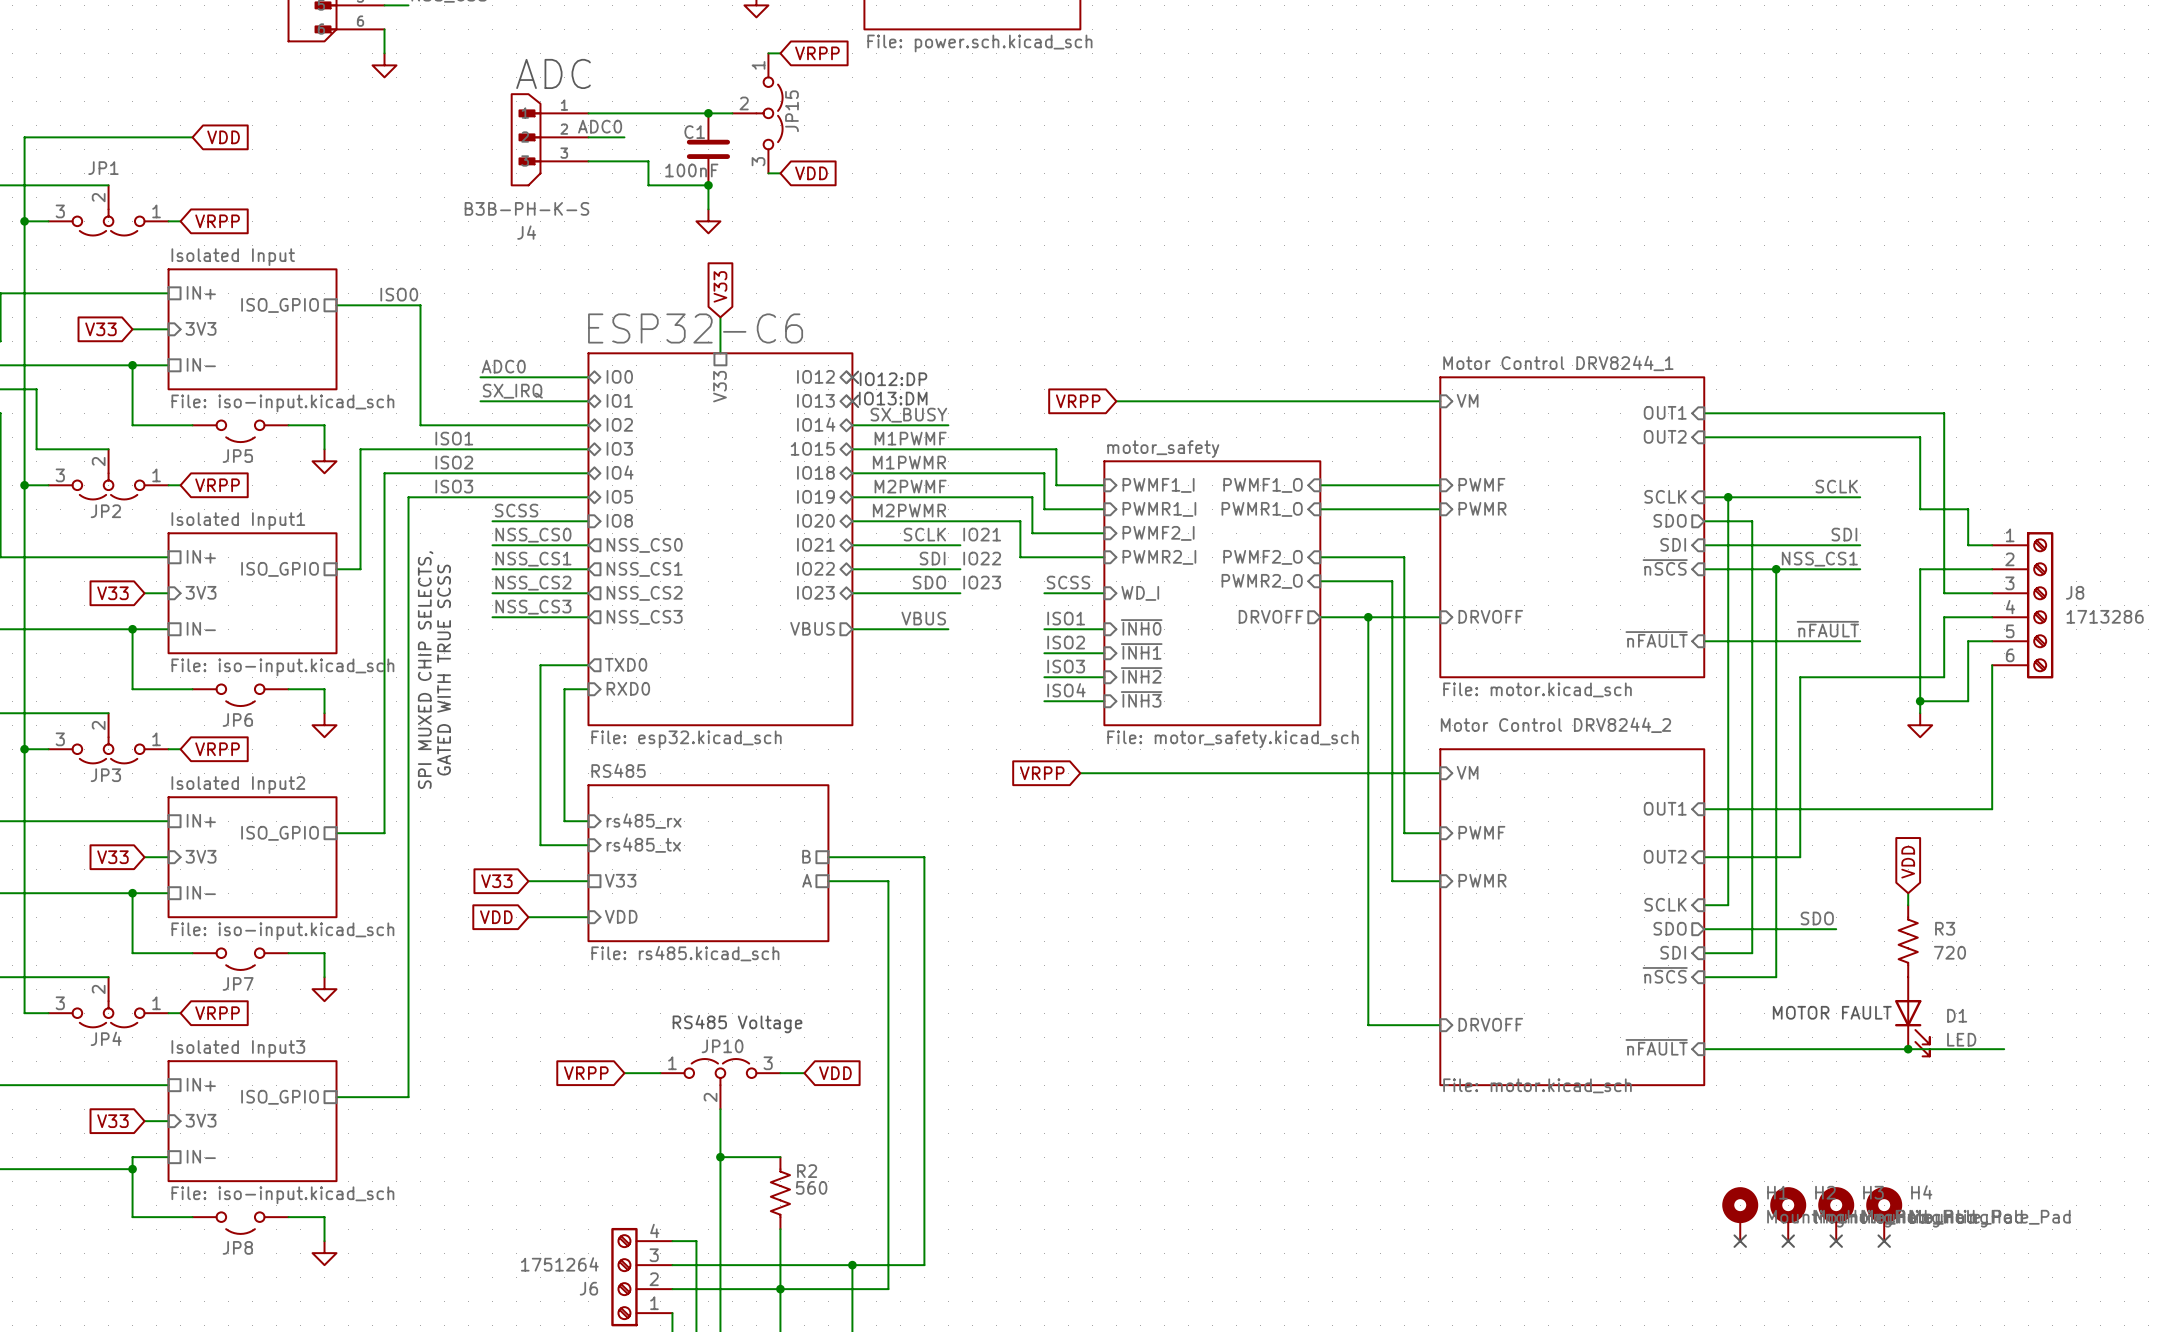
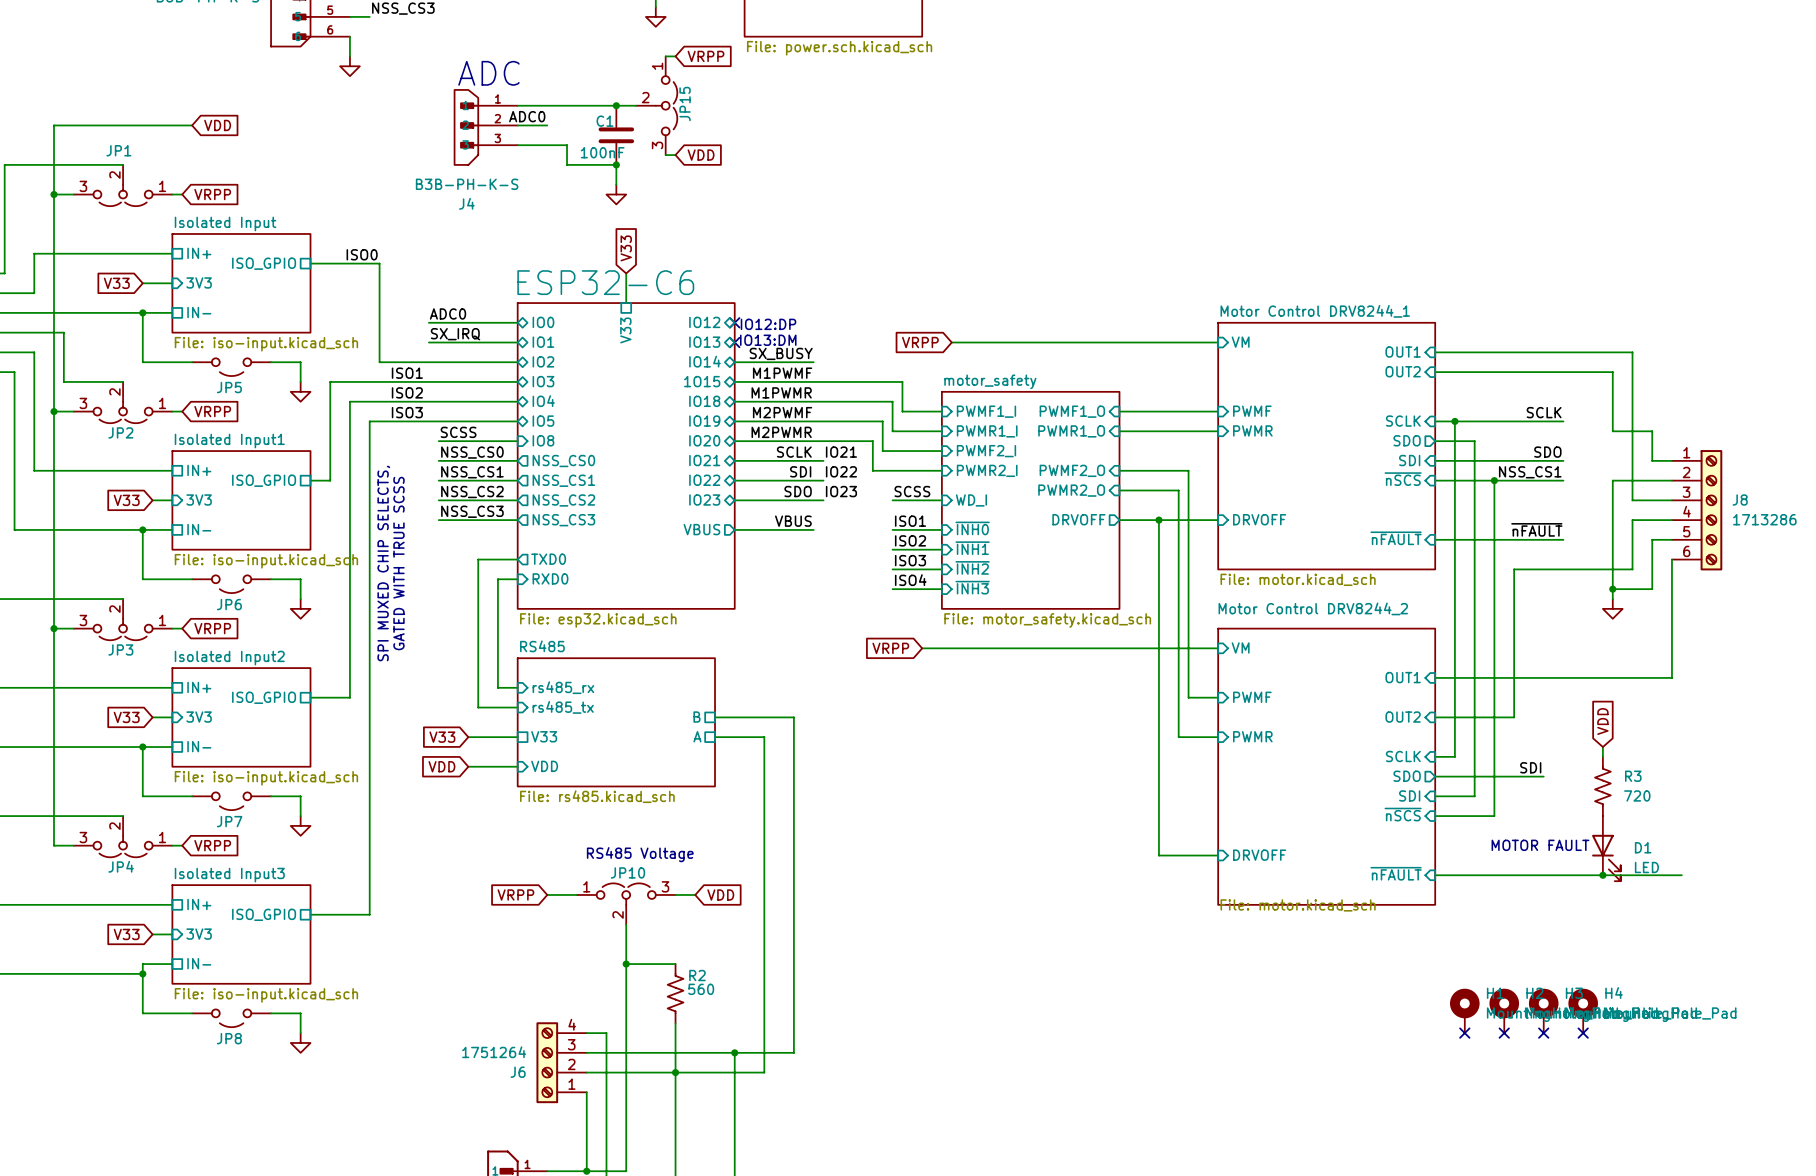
label: SDI (1844, 534) -> SDO (1547, 452)
label: SDO (1817, 918) -> SDI (1530, 767)

